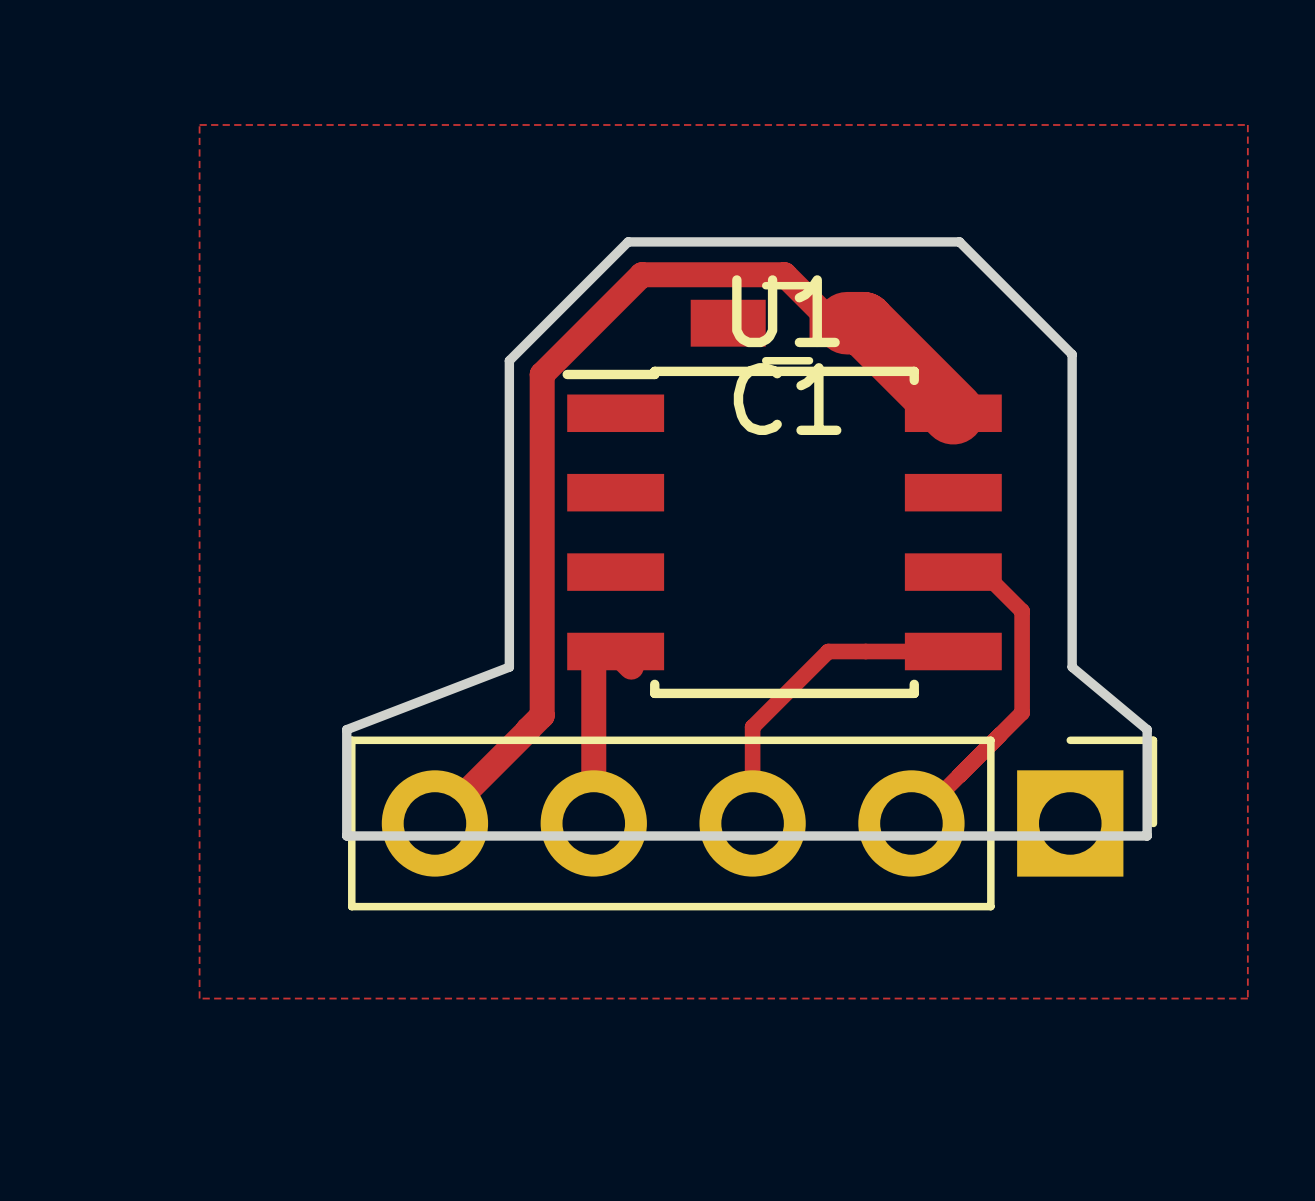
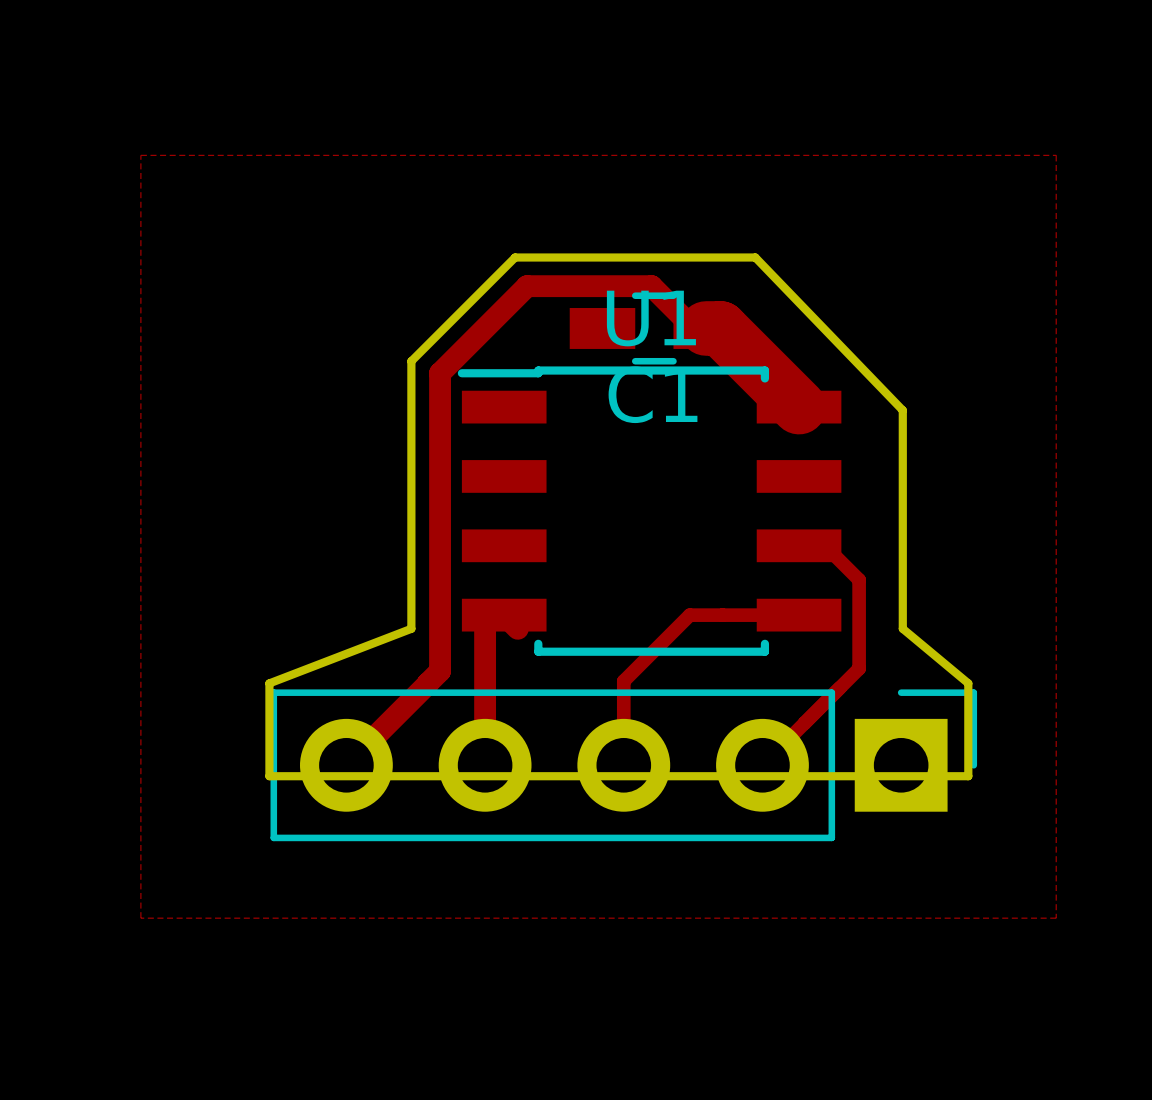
board edge: (903, 241) (959, 241) (1072, 354) (1072, 417) -> (755, 257) (902, 410)

